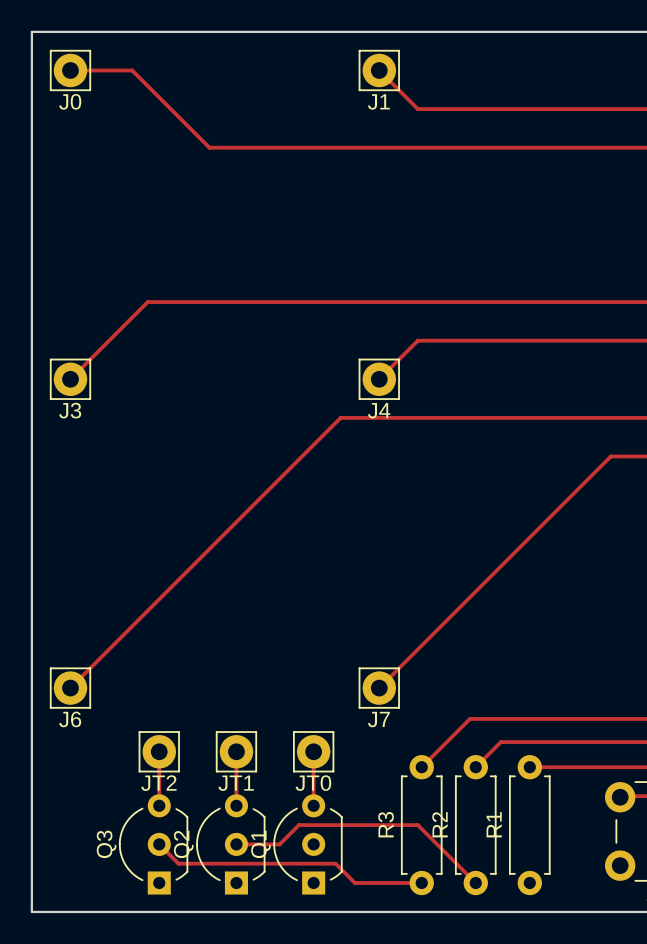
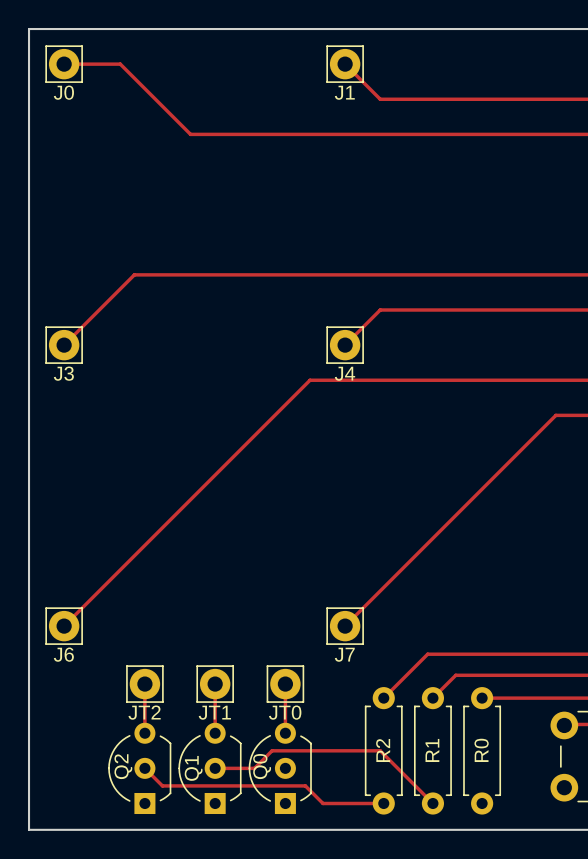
R3 name: R3 (386, 824) -> R2 (383, 750)
R2 name: R2 (439, 824) -> R1 (432, 750)
R1 name: R1 (494, 824) -> R0 (481, 750)
Q3 name: Q3 (106, 844) -> Q2 (123, 766)
Q2 name: Q2 (183, 844) -> Q1 (193, 768)
Q1 name: Q1 (260, 844) -> Q0 (262, 766)

